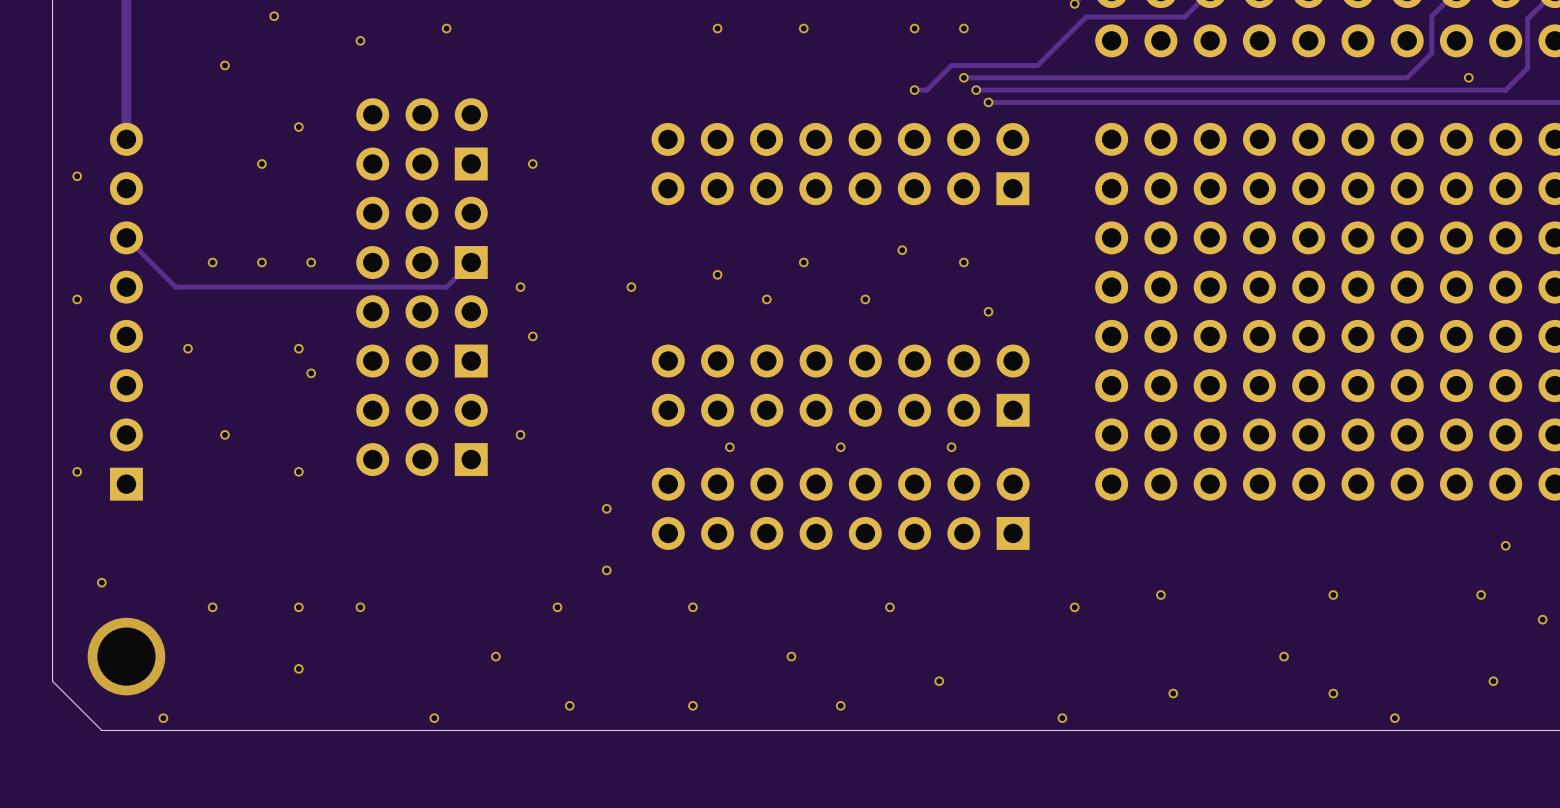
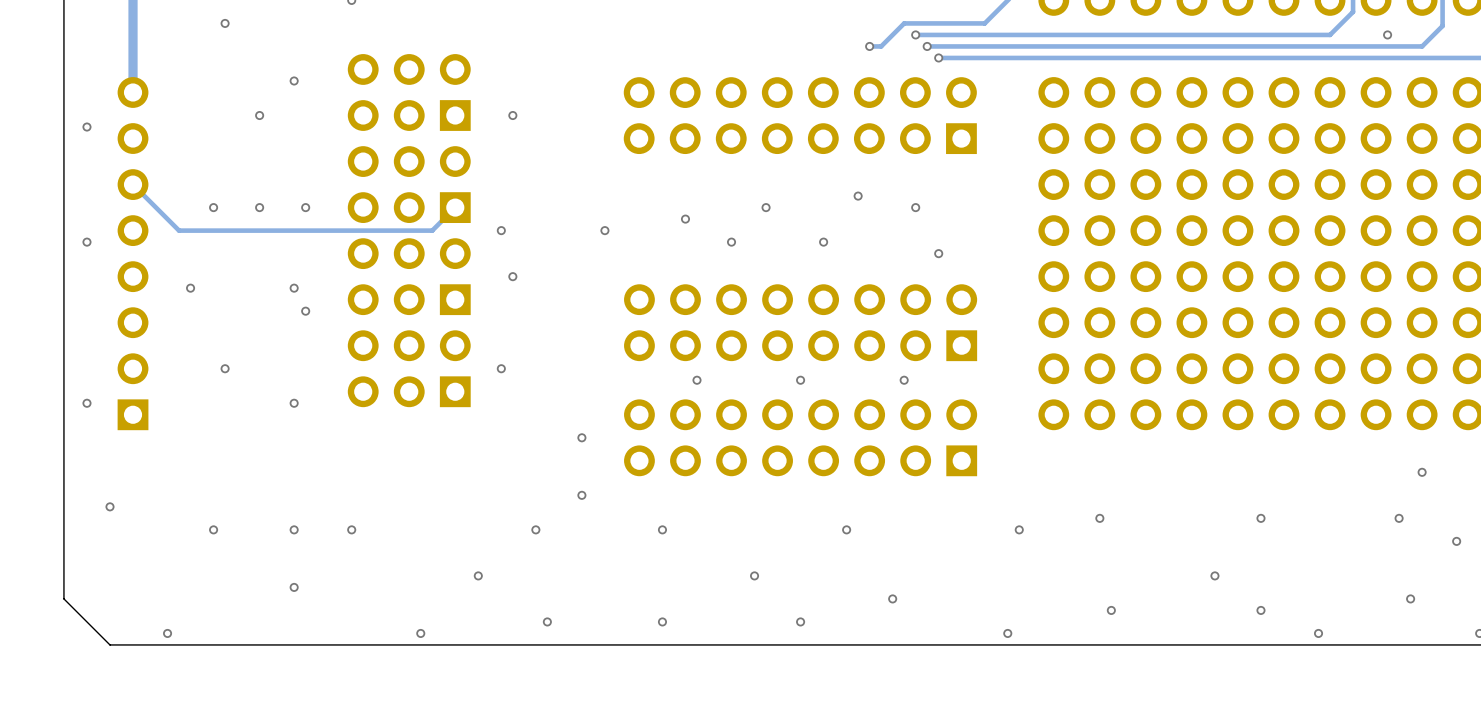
via: (126, 656) -> none

